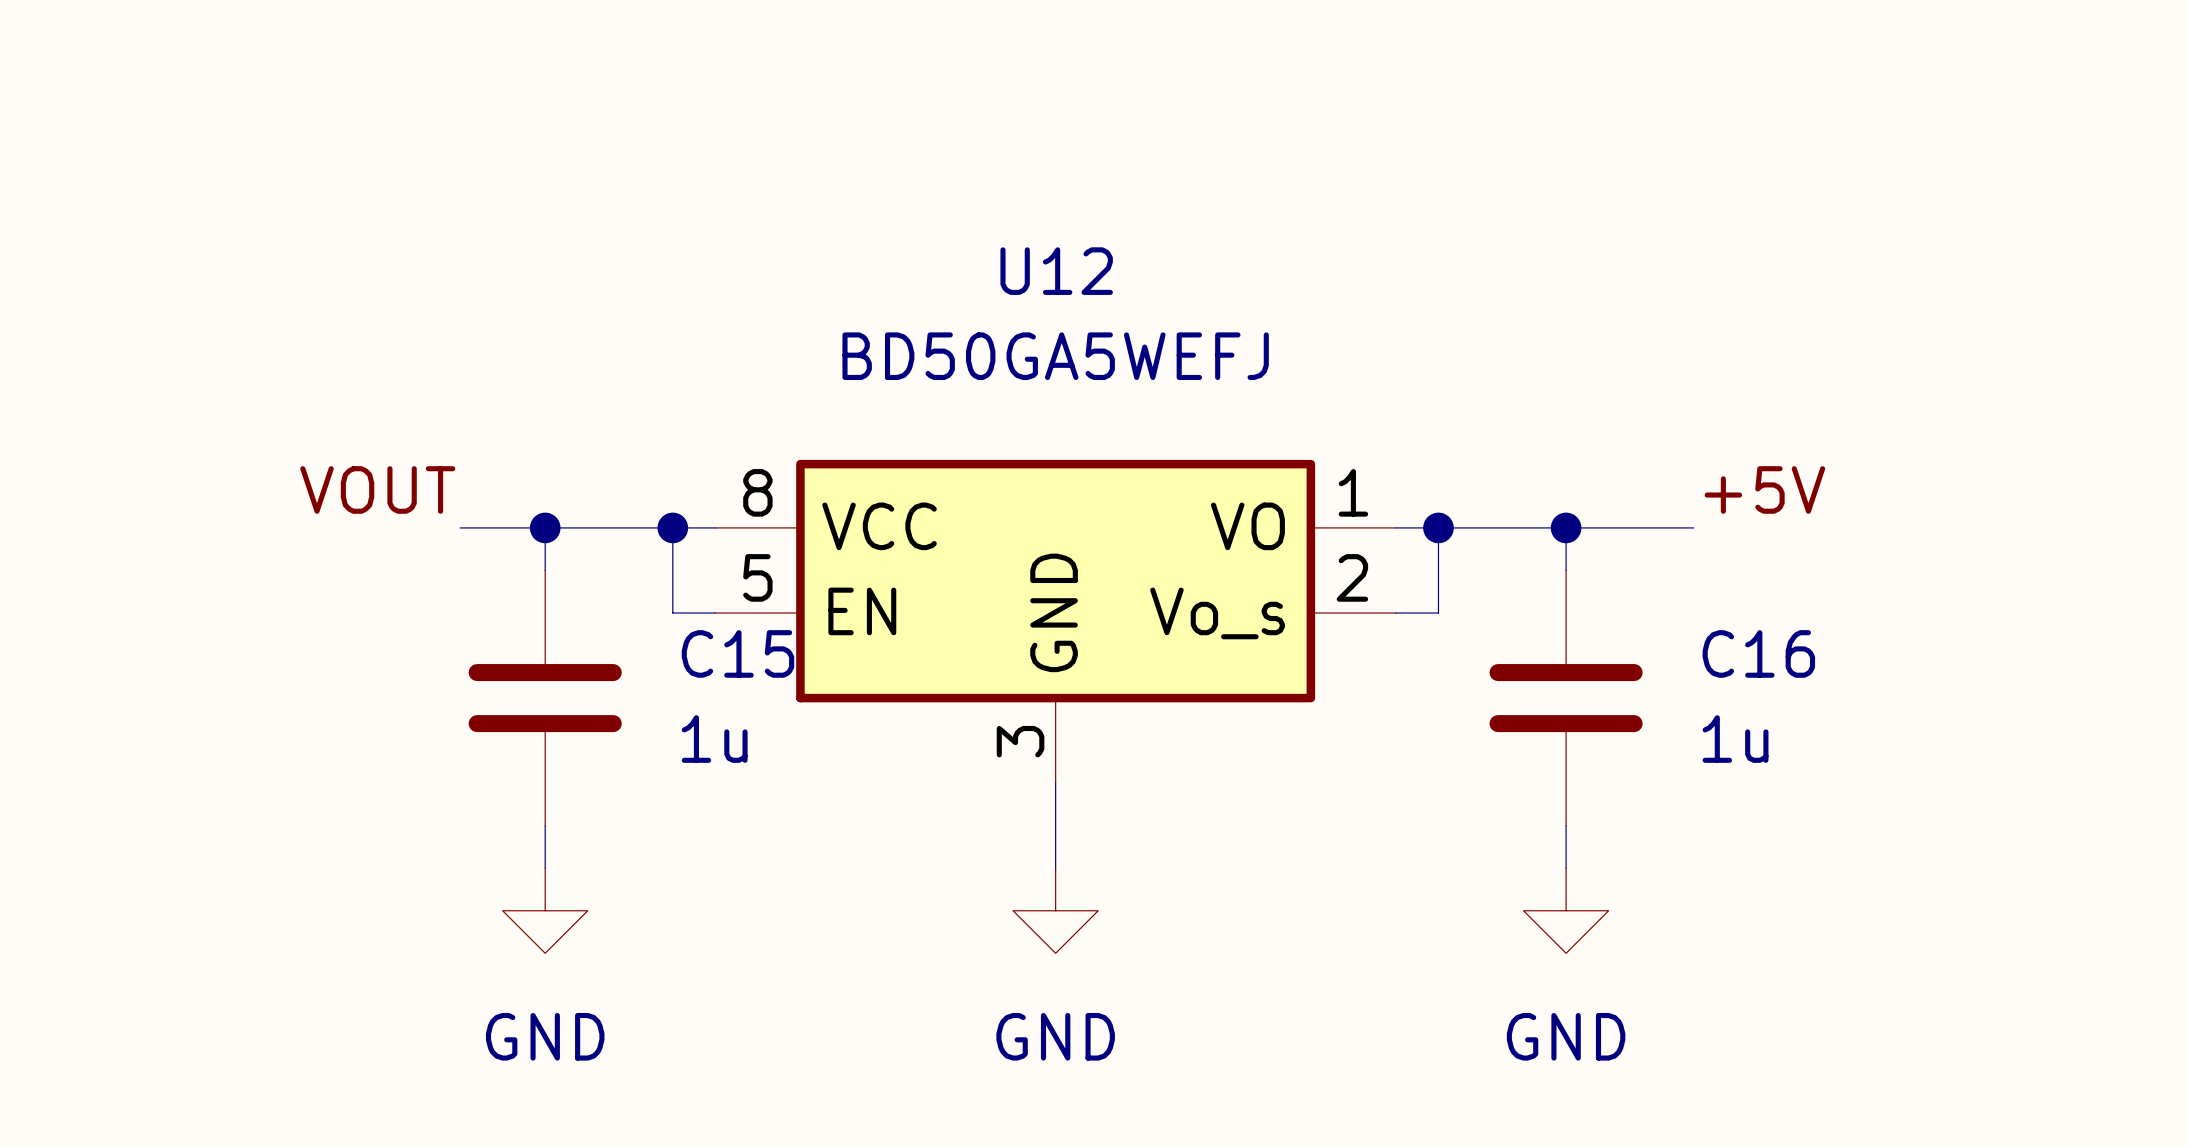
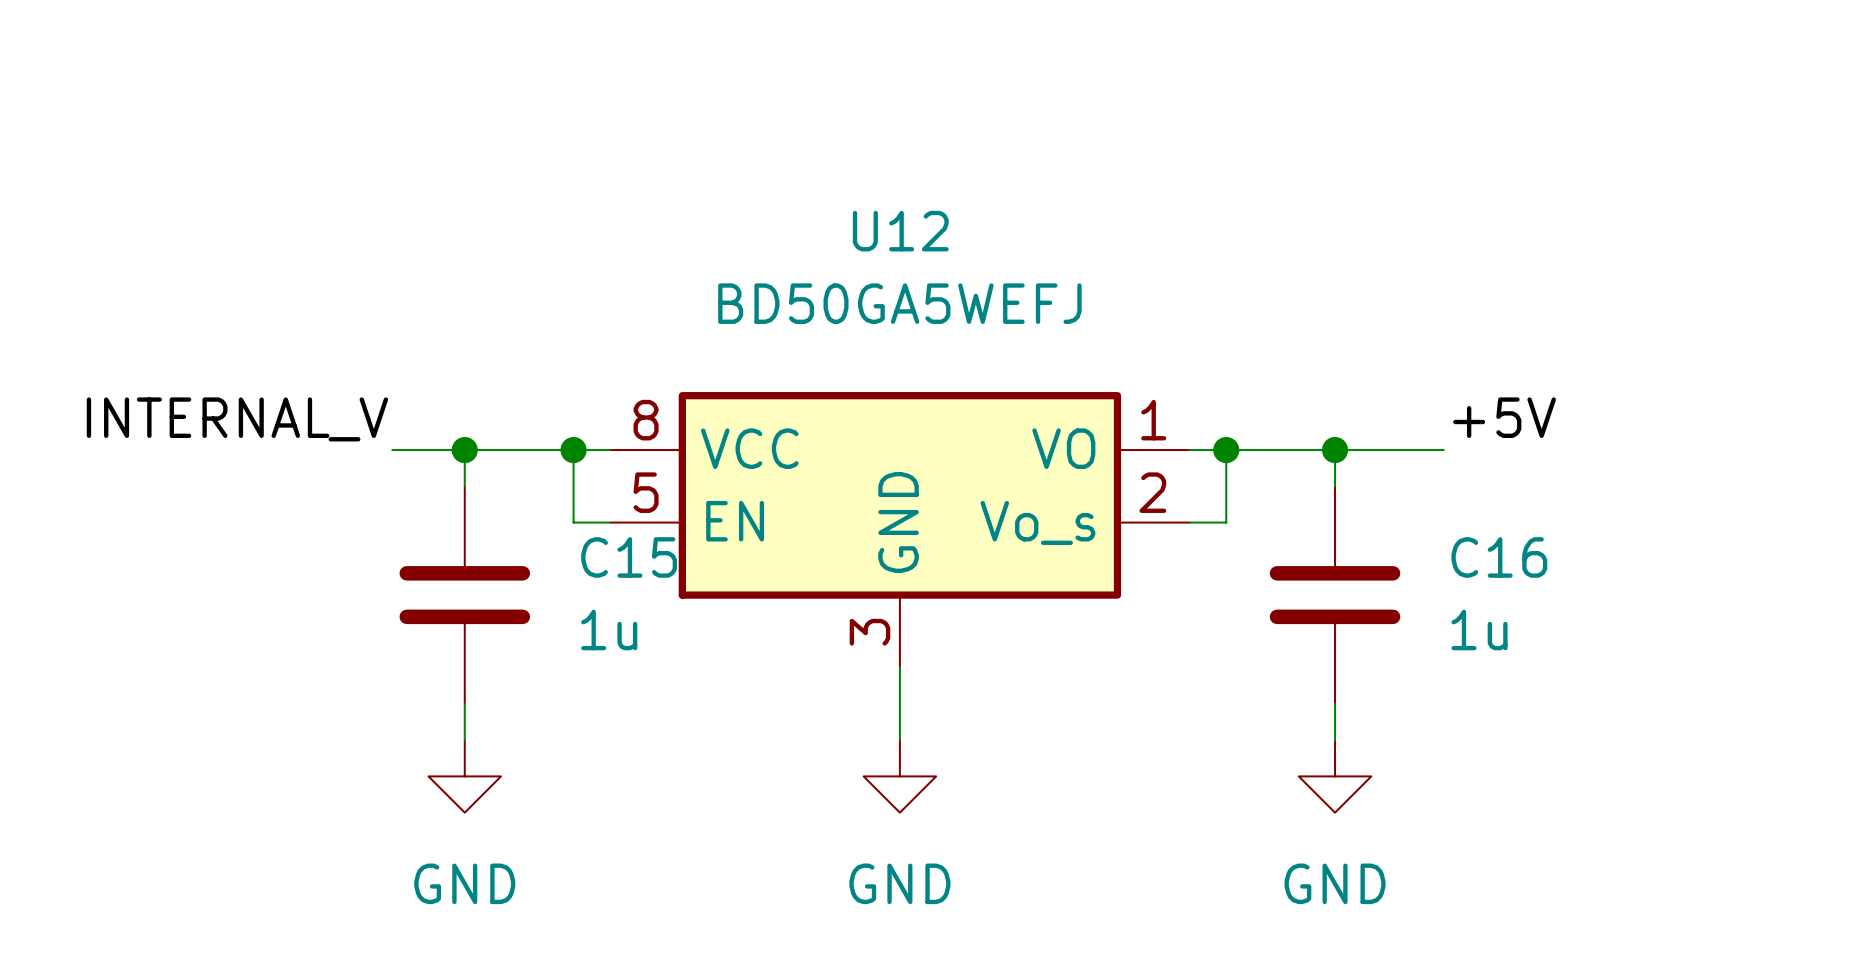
label: VOUT (377, 489) -> INTERNAL_V (237, 419)

